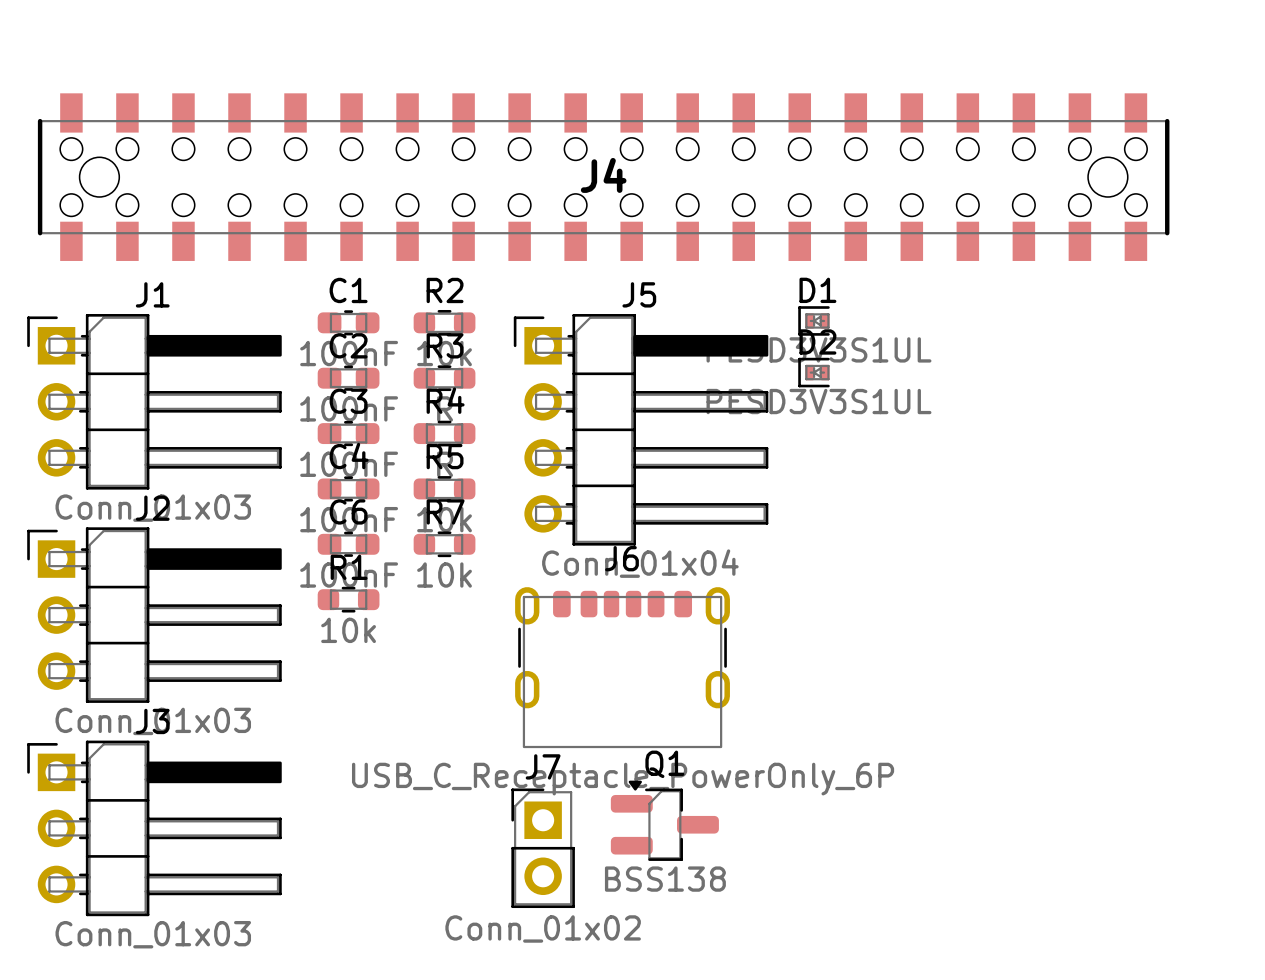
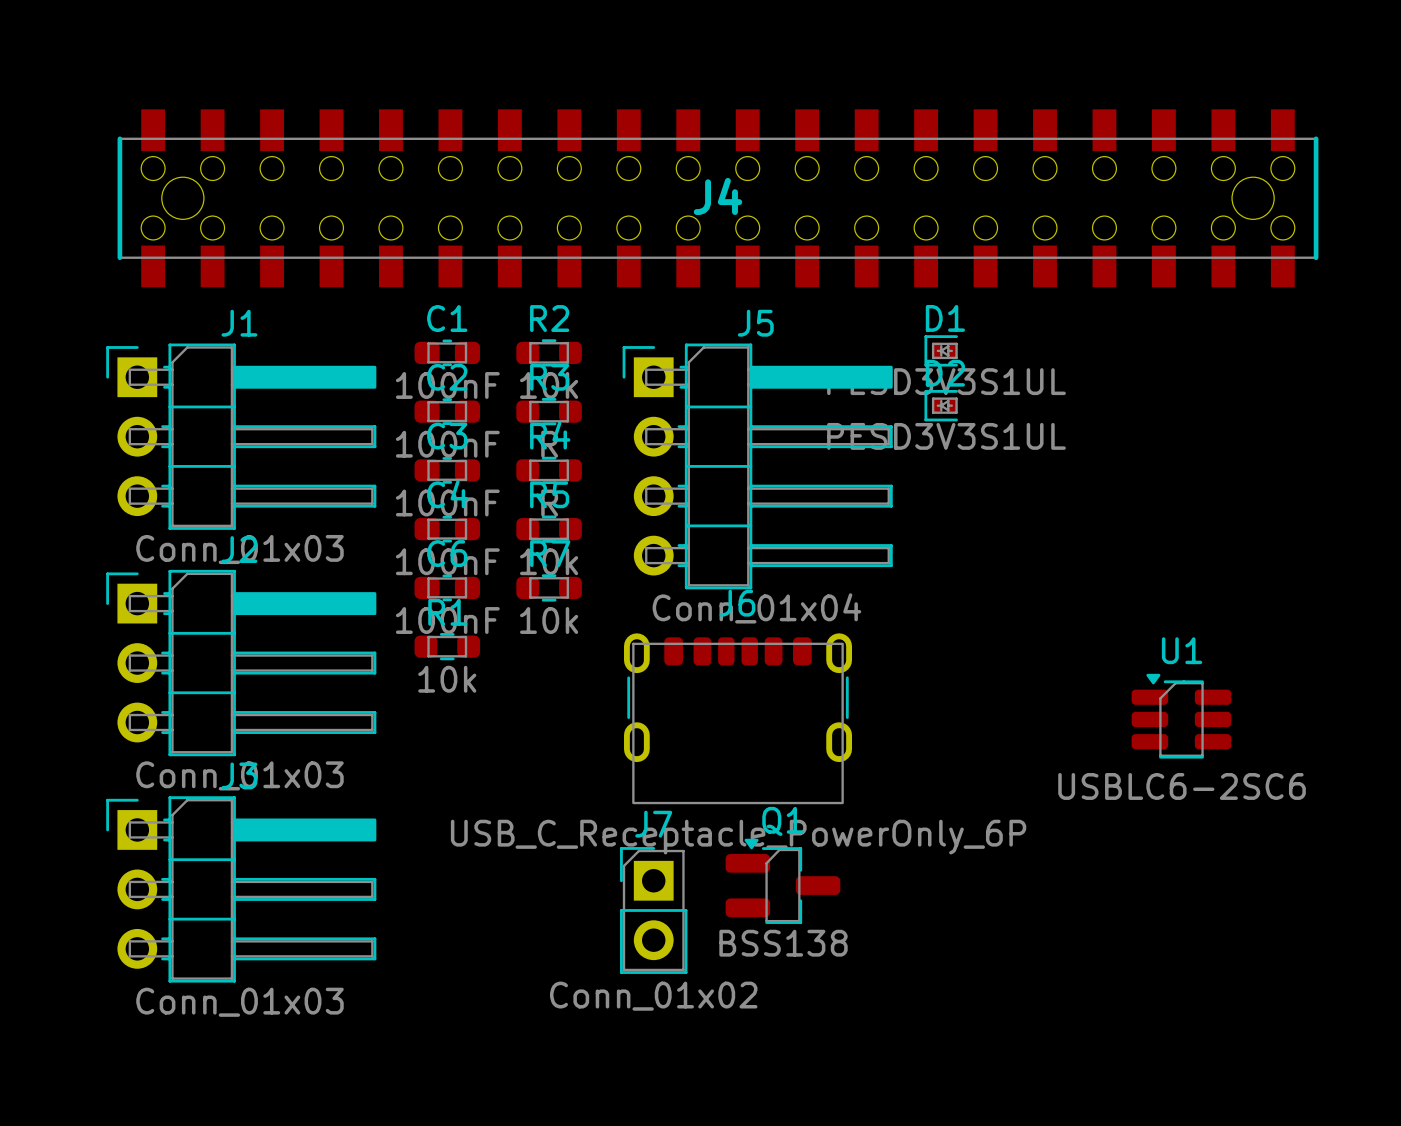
U1: none -> USBLC6-2SC6 (1181, 716)

